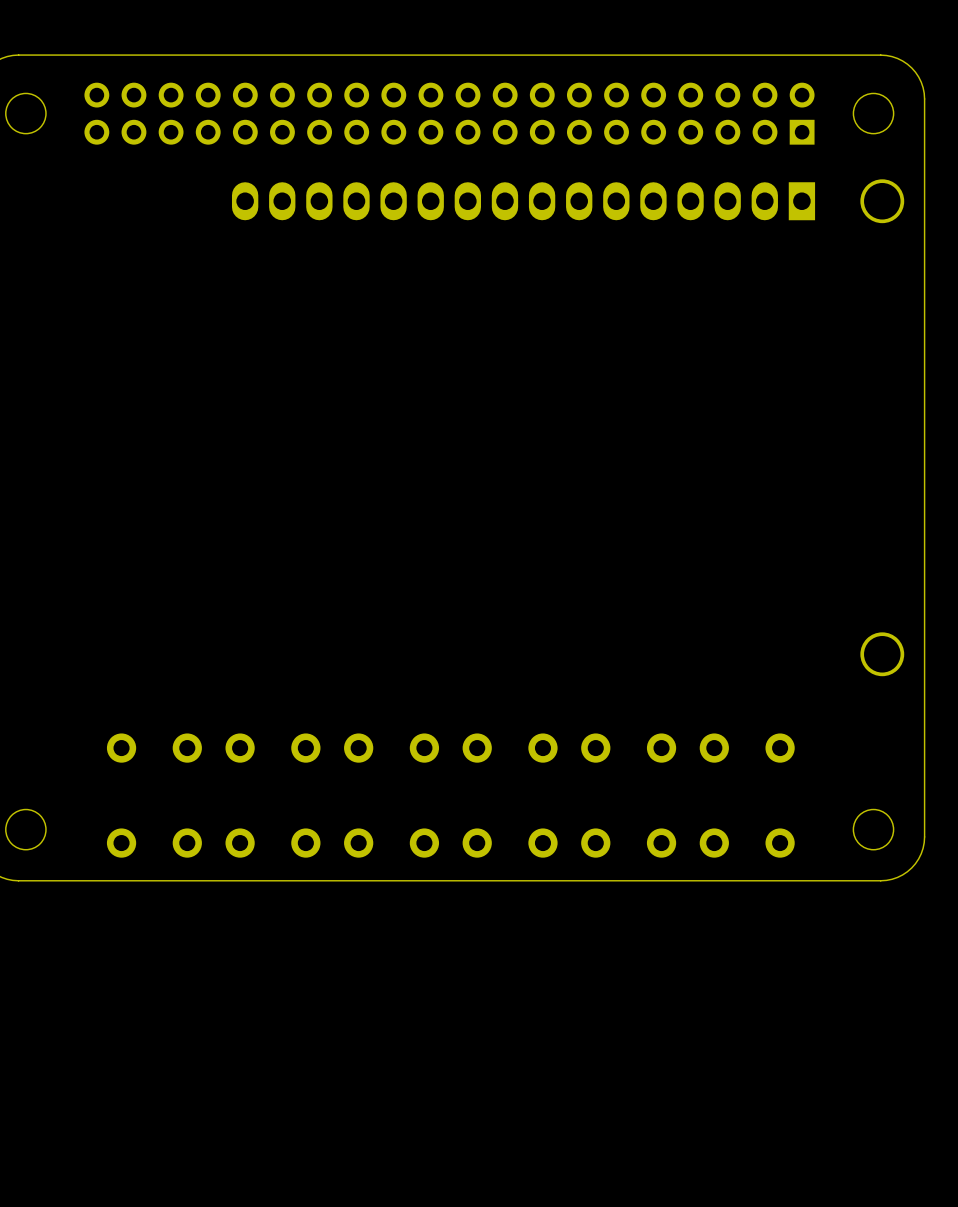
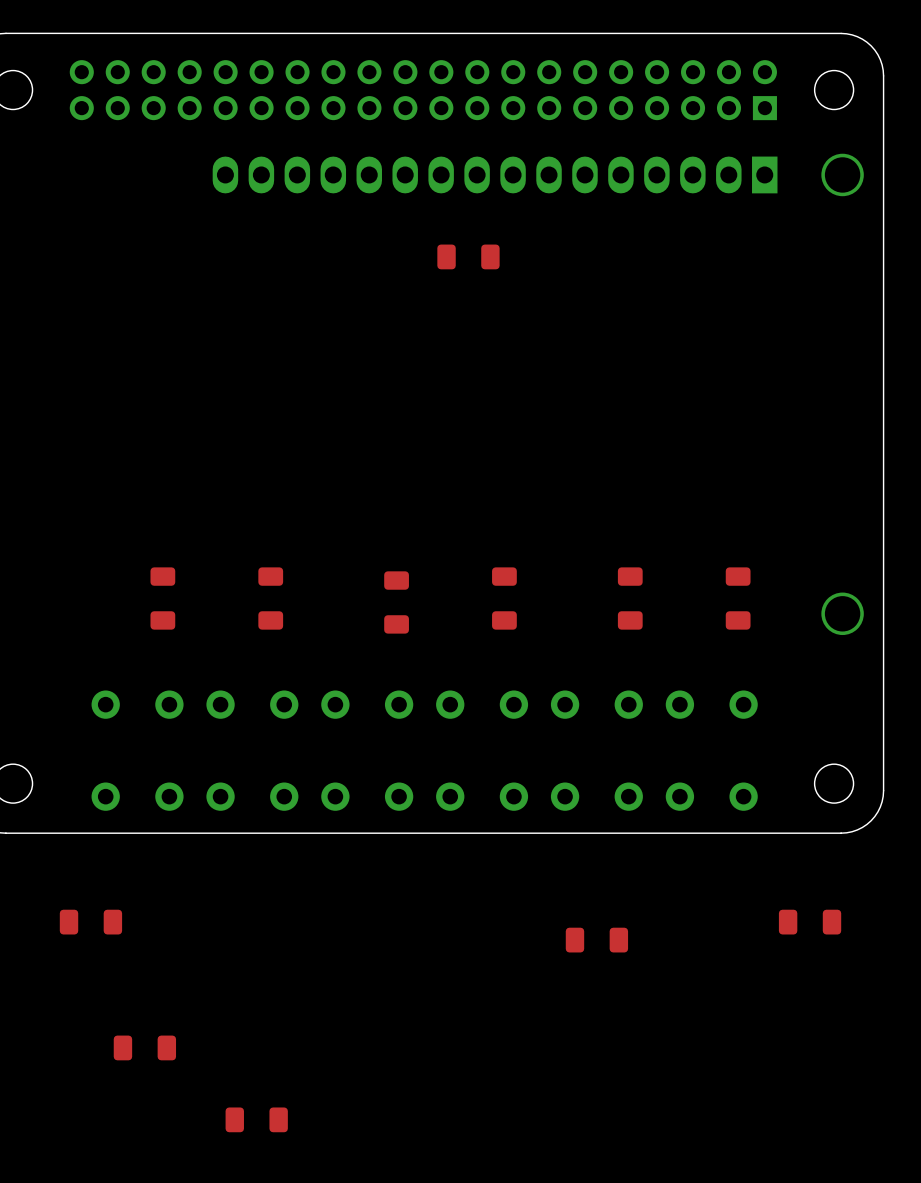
part: none -> (468, 256)
part: none -> (162, 598)
part: none -> (270, 598)
part: none -> (504, 598)
part: none -> (630, 598)
part: none -> (738, 598)
part: none -> (396, 602)
part: none -> (90, 922)
part: none -> (810, 922)
part: none -> (596, 940)
part: none -> (144, 1047)
part: none -> (256, 1119)

